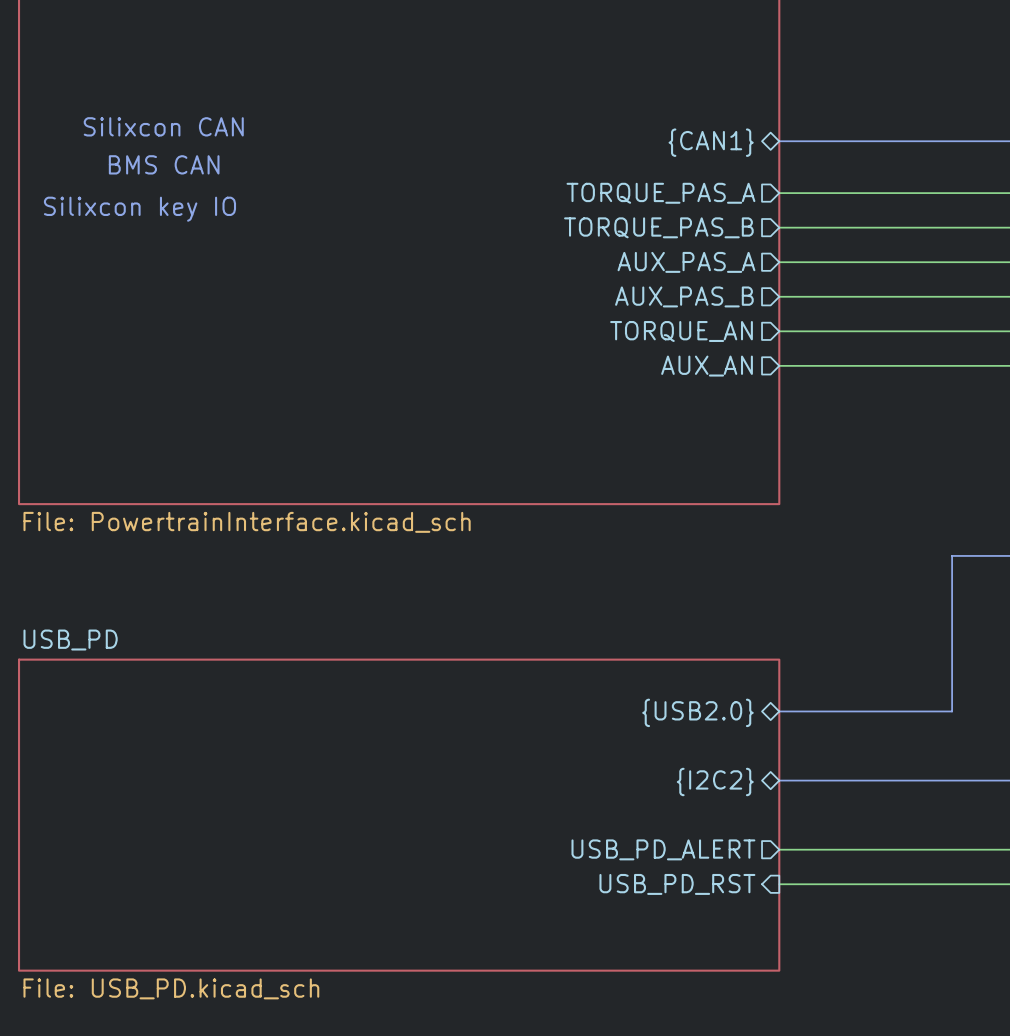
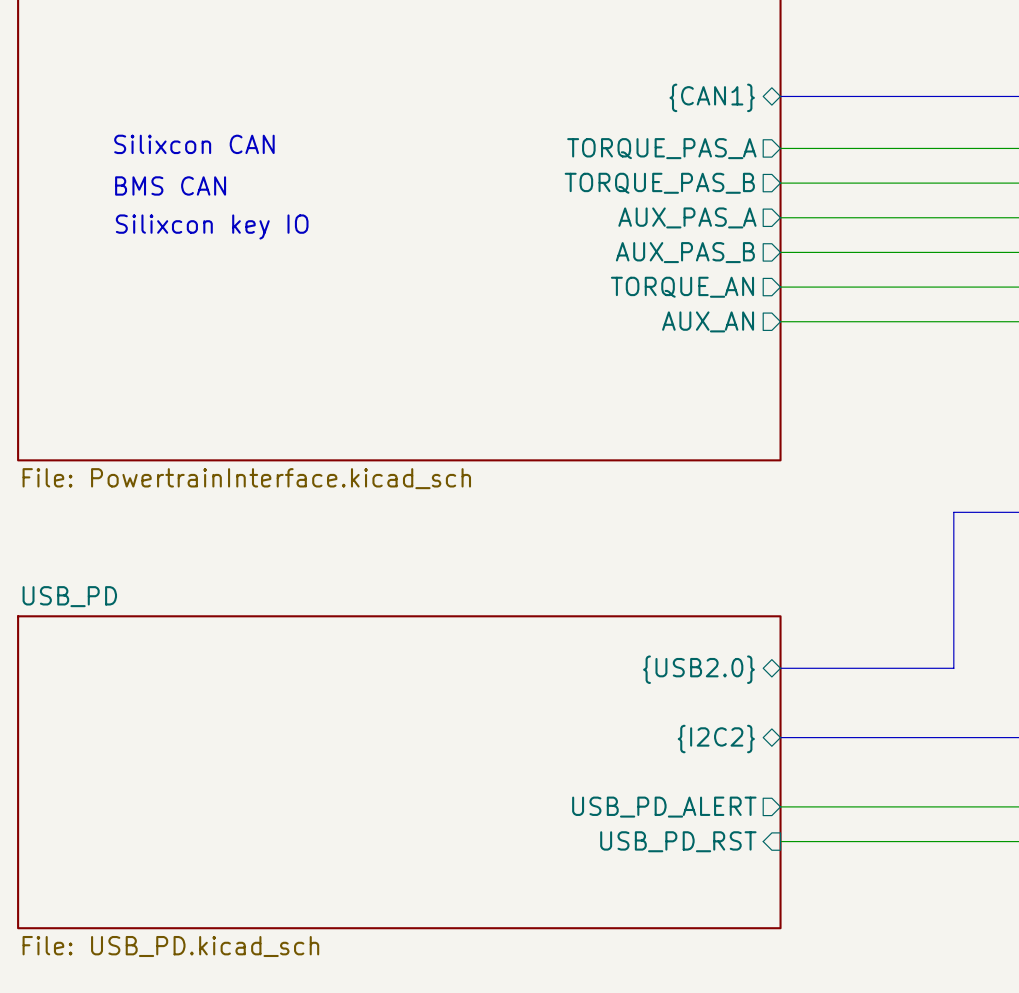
text position: Silixcon CAN (163, 126) -> Silixcon CAN (194, 144)
text position: BMS CAN (164, 164) -> BMS CAN (170, 185)
text position: Silixcon key IO (139, 209) -> Silixcon key IO (212, 226)

